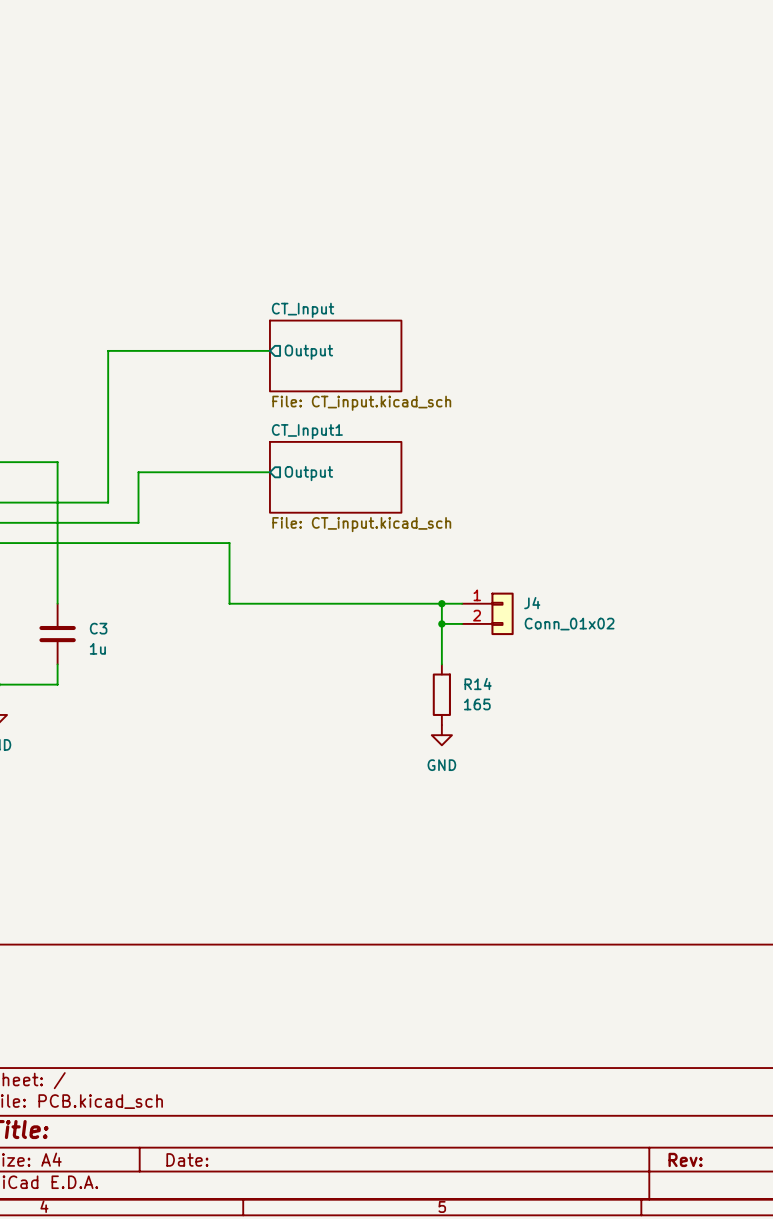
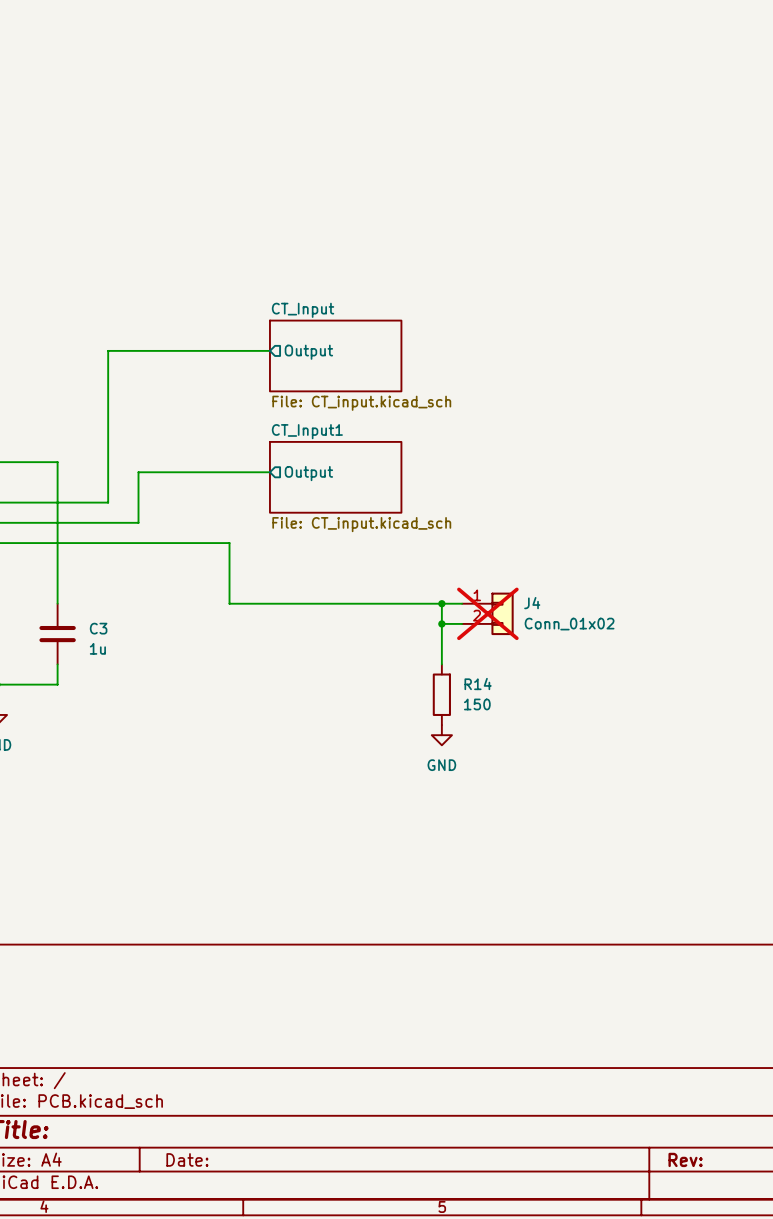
J4 do-not-place cross: none -> (487, 613)
R14 value: 165 (477, 704) -> 150 (477, 704)

